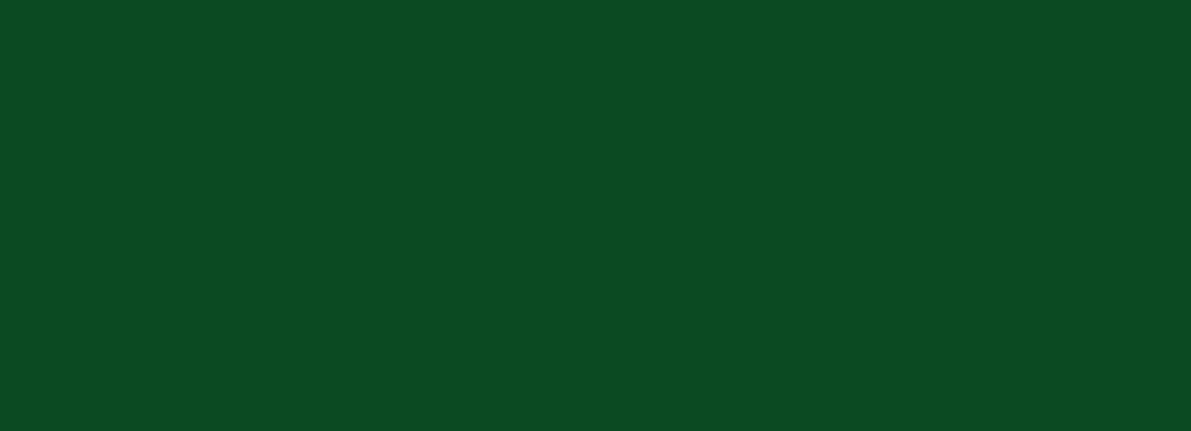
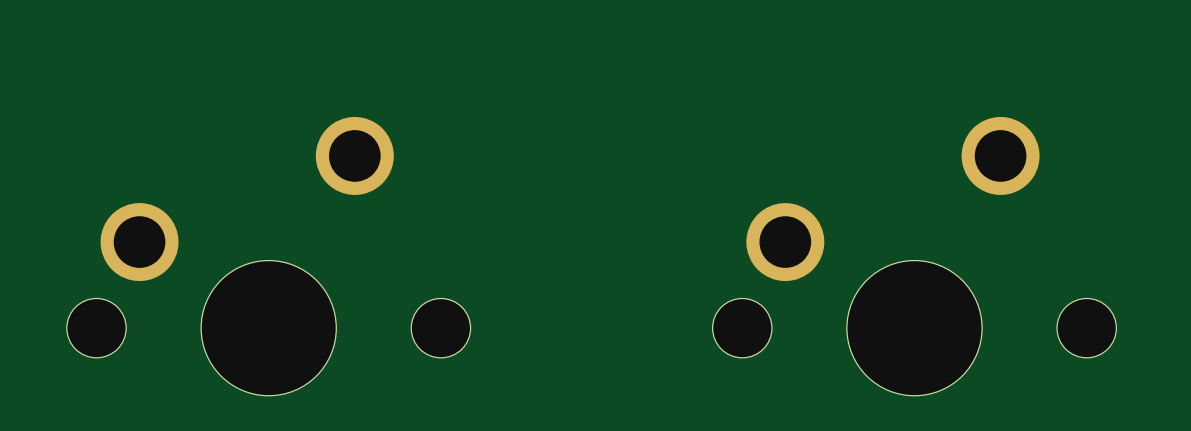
part: none -> (268, 256)
part: none -> (914, 256)

